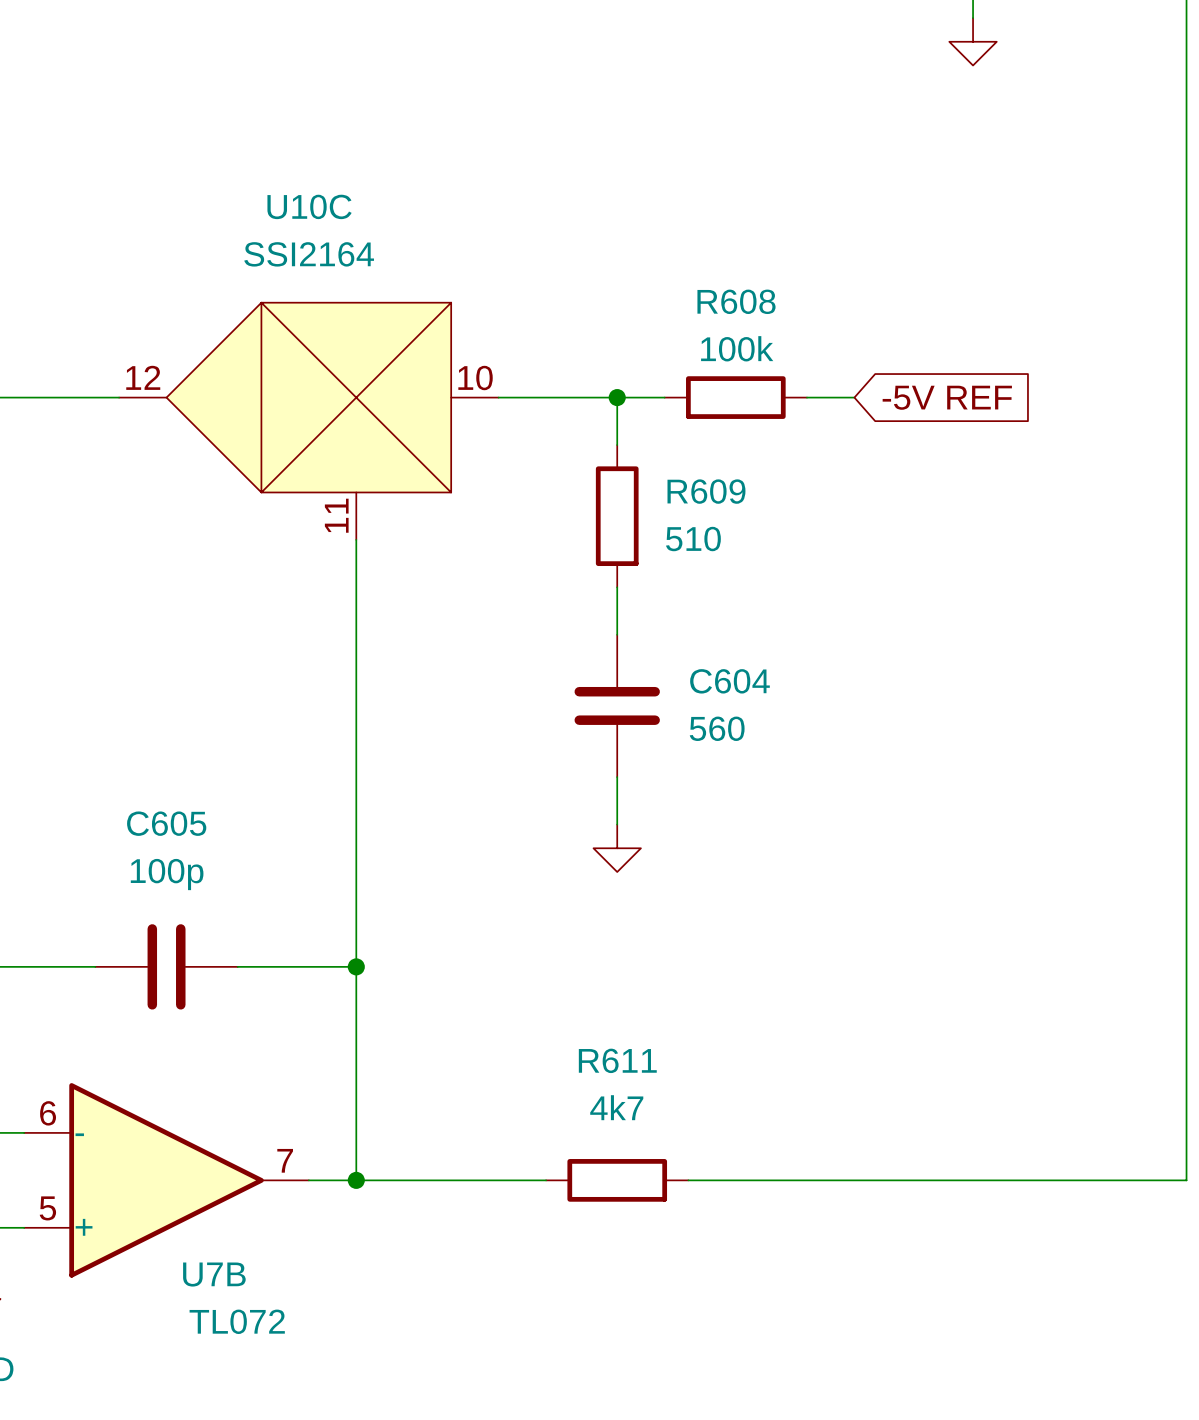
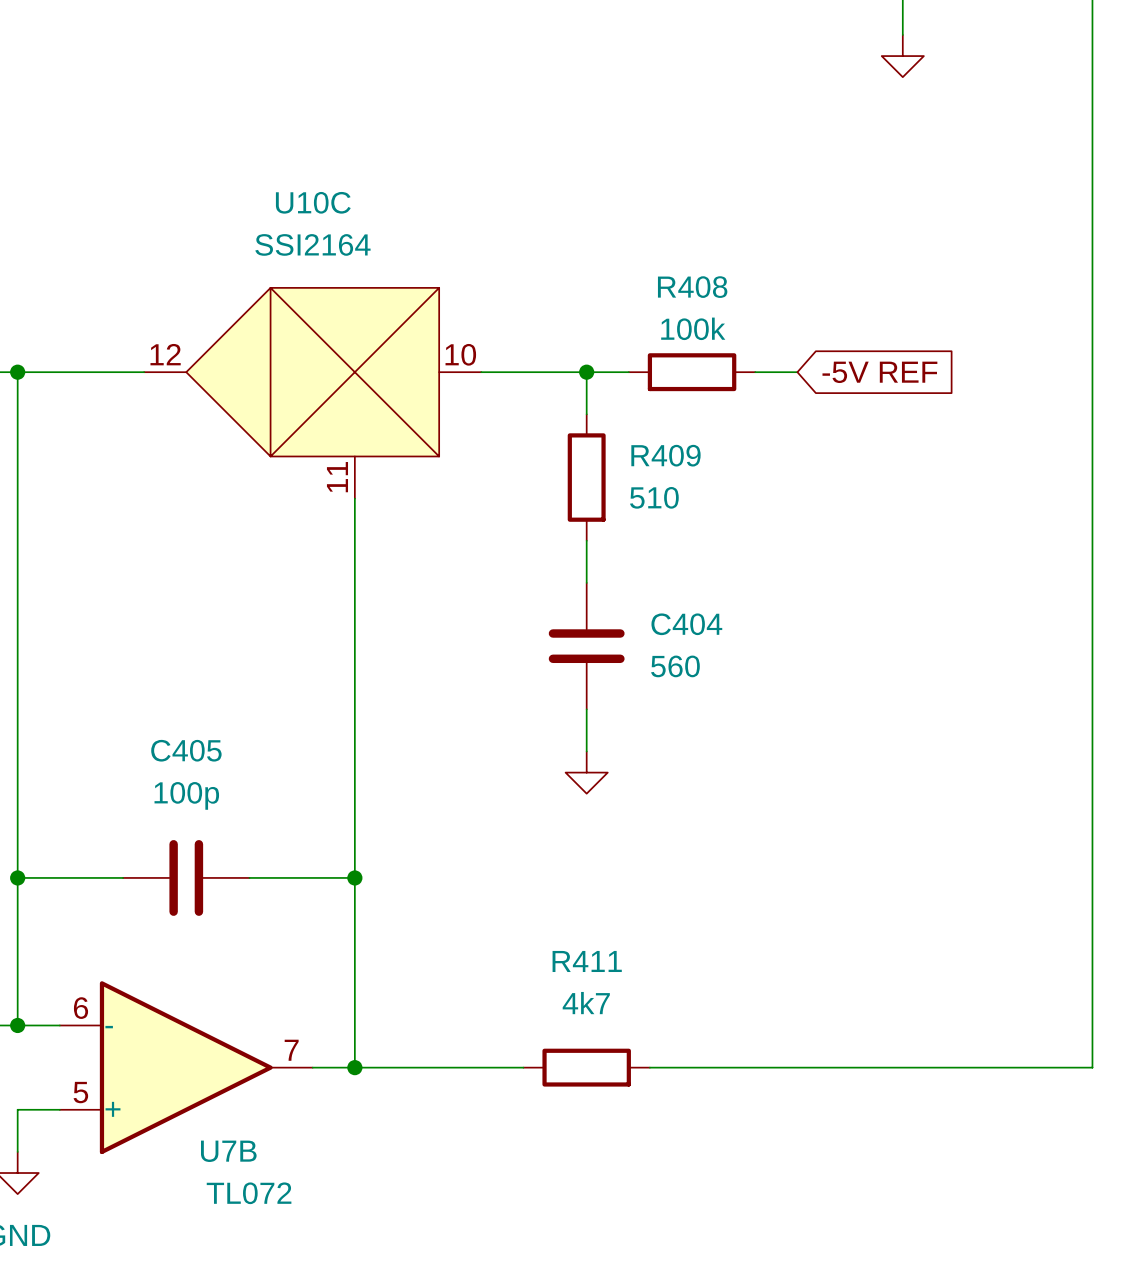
R608 name: R608 (736, 301) -> R408 (692, 287)
R609 name: R609 (706, 491) -> R409 (665, 455)
C604 name: C604 (729, 681) -> C404 (686, 624)
C605 name: C605 (166, 823) -> C405 (186, 750)
R611 name: R611 (617, 1060) -> R411 (587, 961)

